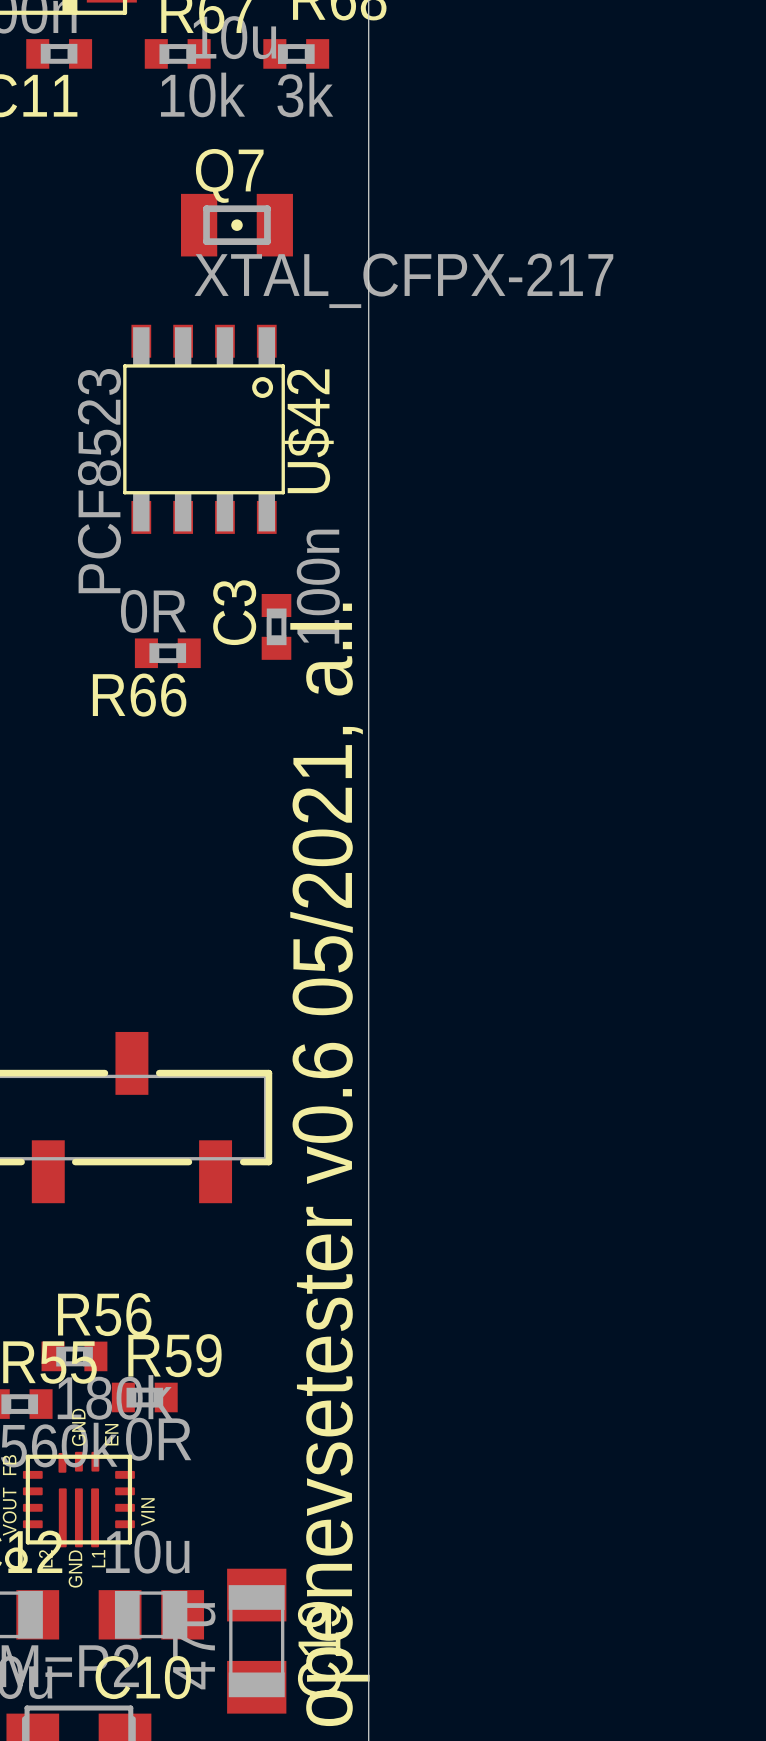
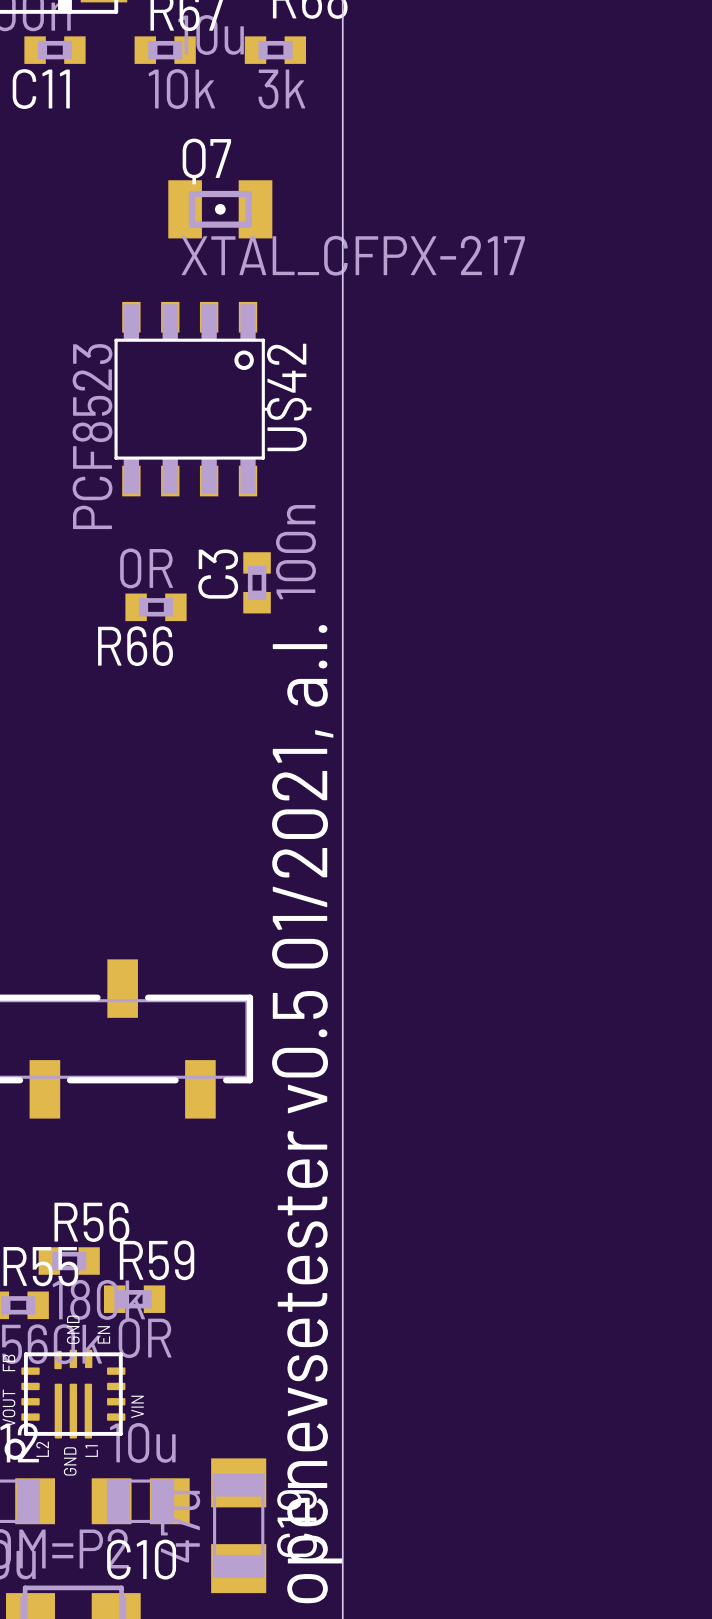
text: openevsetester v0.6 05/2021, a.l. (329, 1164) -> openevsetester v0.5 01/2021, a.l. (307, 1114)

